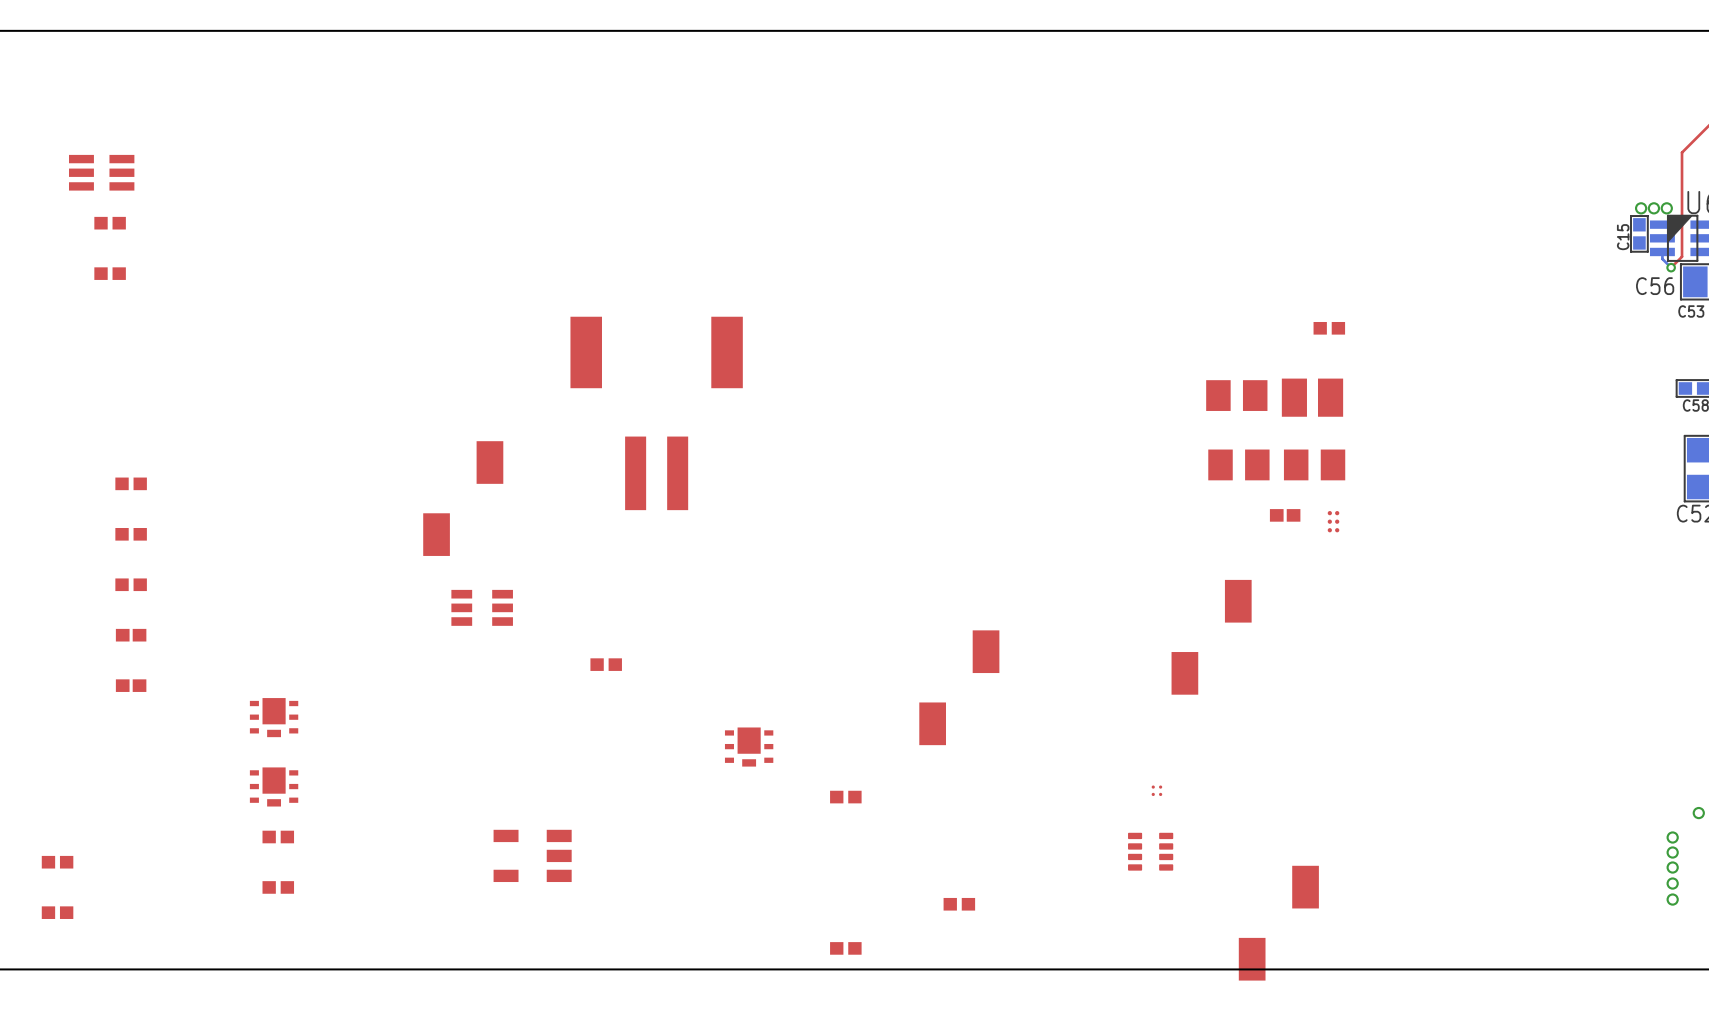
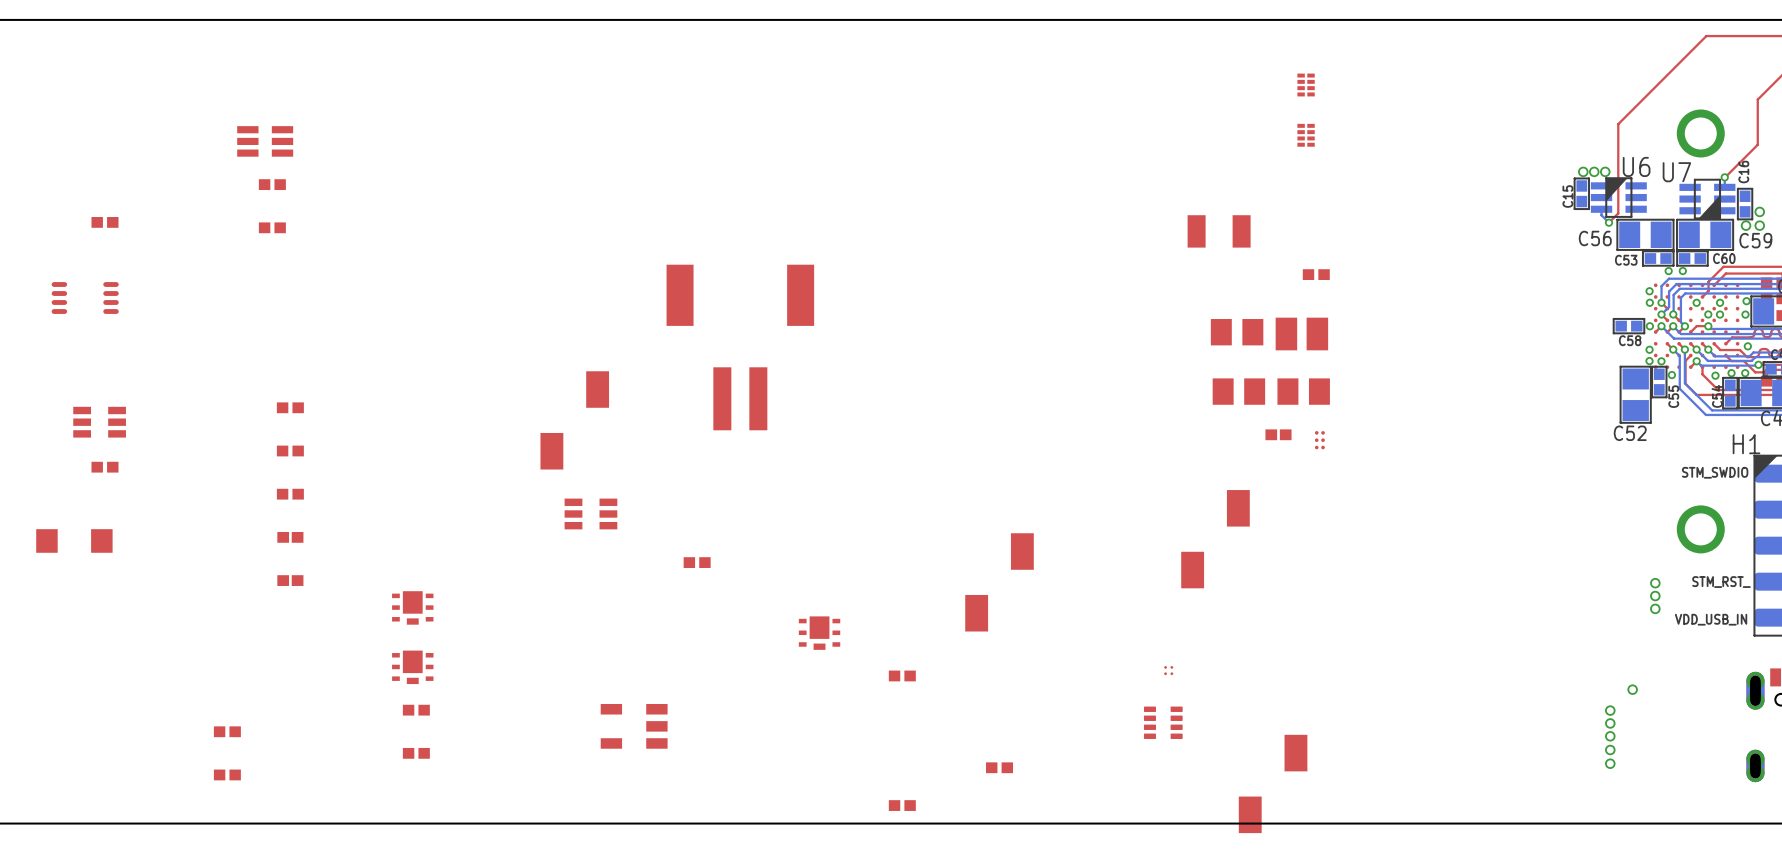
part: none -> (1306, 85)
part: none -> (1306, 135)
part: none -> (1219, 231)

